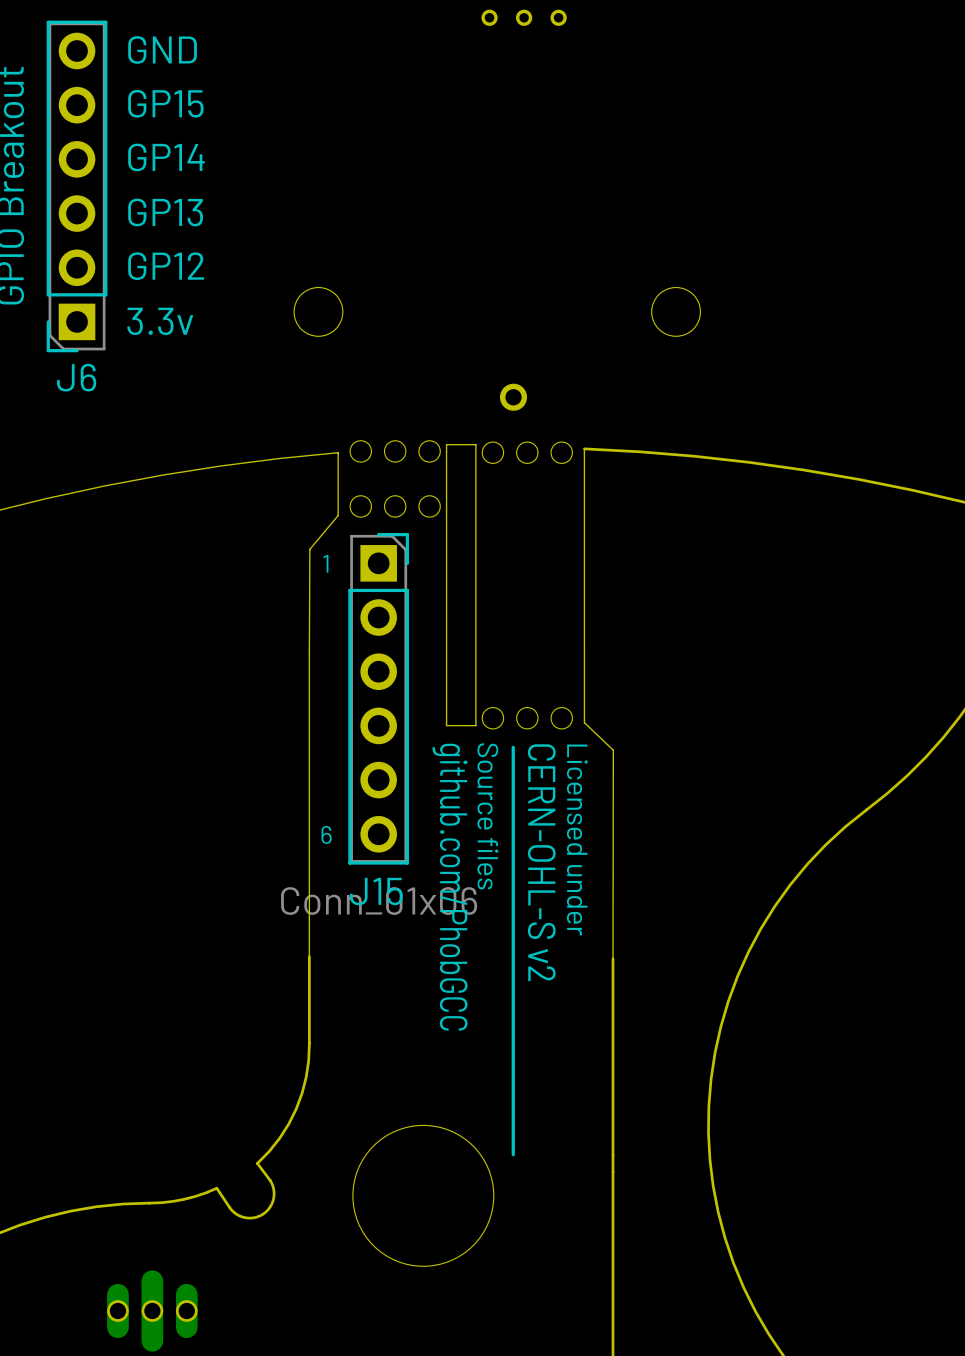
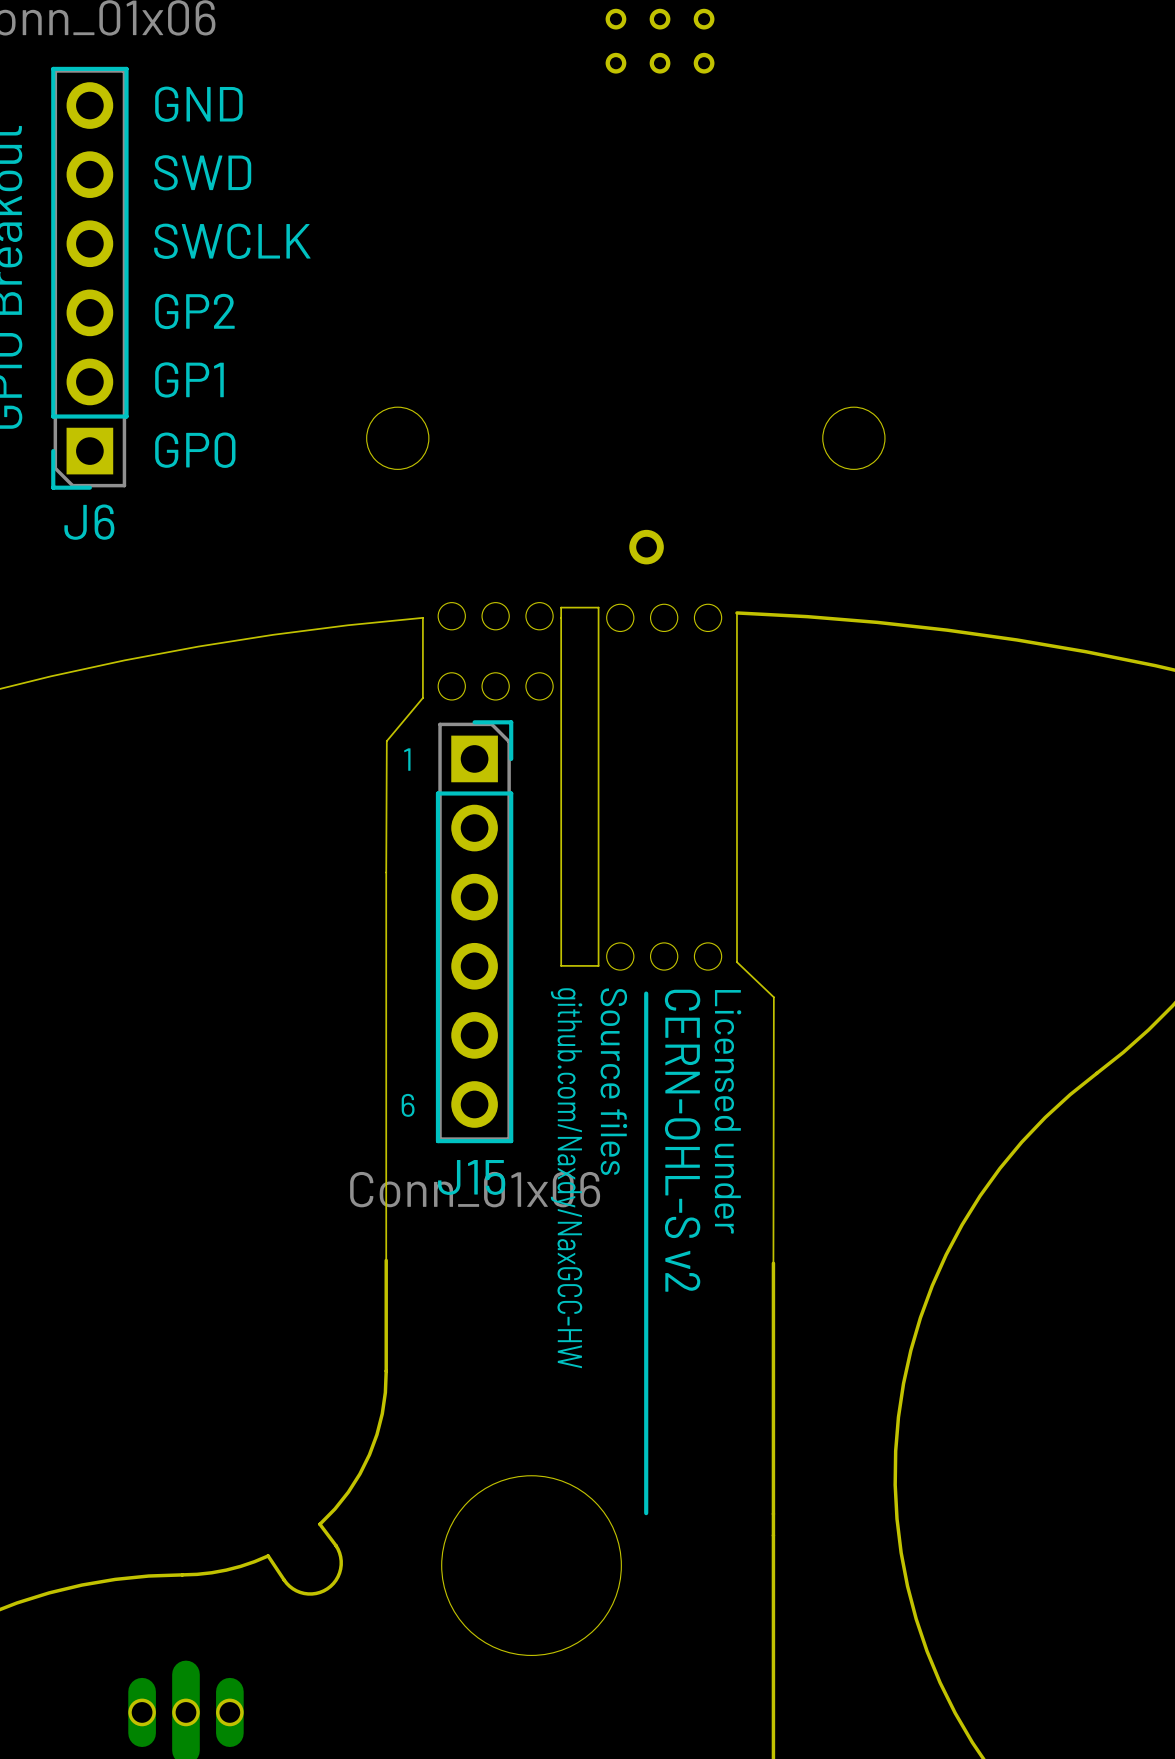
text: GP15 (165, 103) -> SWD (202, 172)
text: GP14 (166, 157) -> SWCLK (232, 241)
text: GP13 (165, 212) -> GP2 (194, 311)
text: GP12 (166, 266) -> GP1 (189, 379)
text: 3.3v (160, 321) -> GP0 (195, 450)
text: github.com/PhobGCC (450, 887) -> github.com/Naxdy/NaxGCC-HW (566, 1178)

